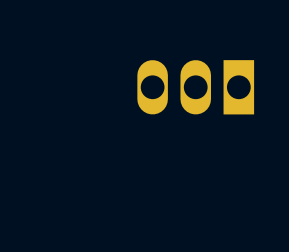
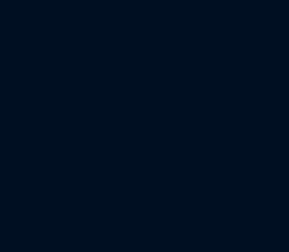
part: (195, 87) -> none

